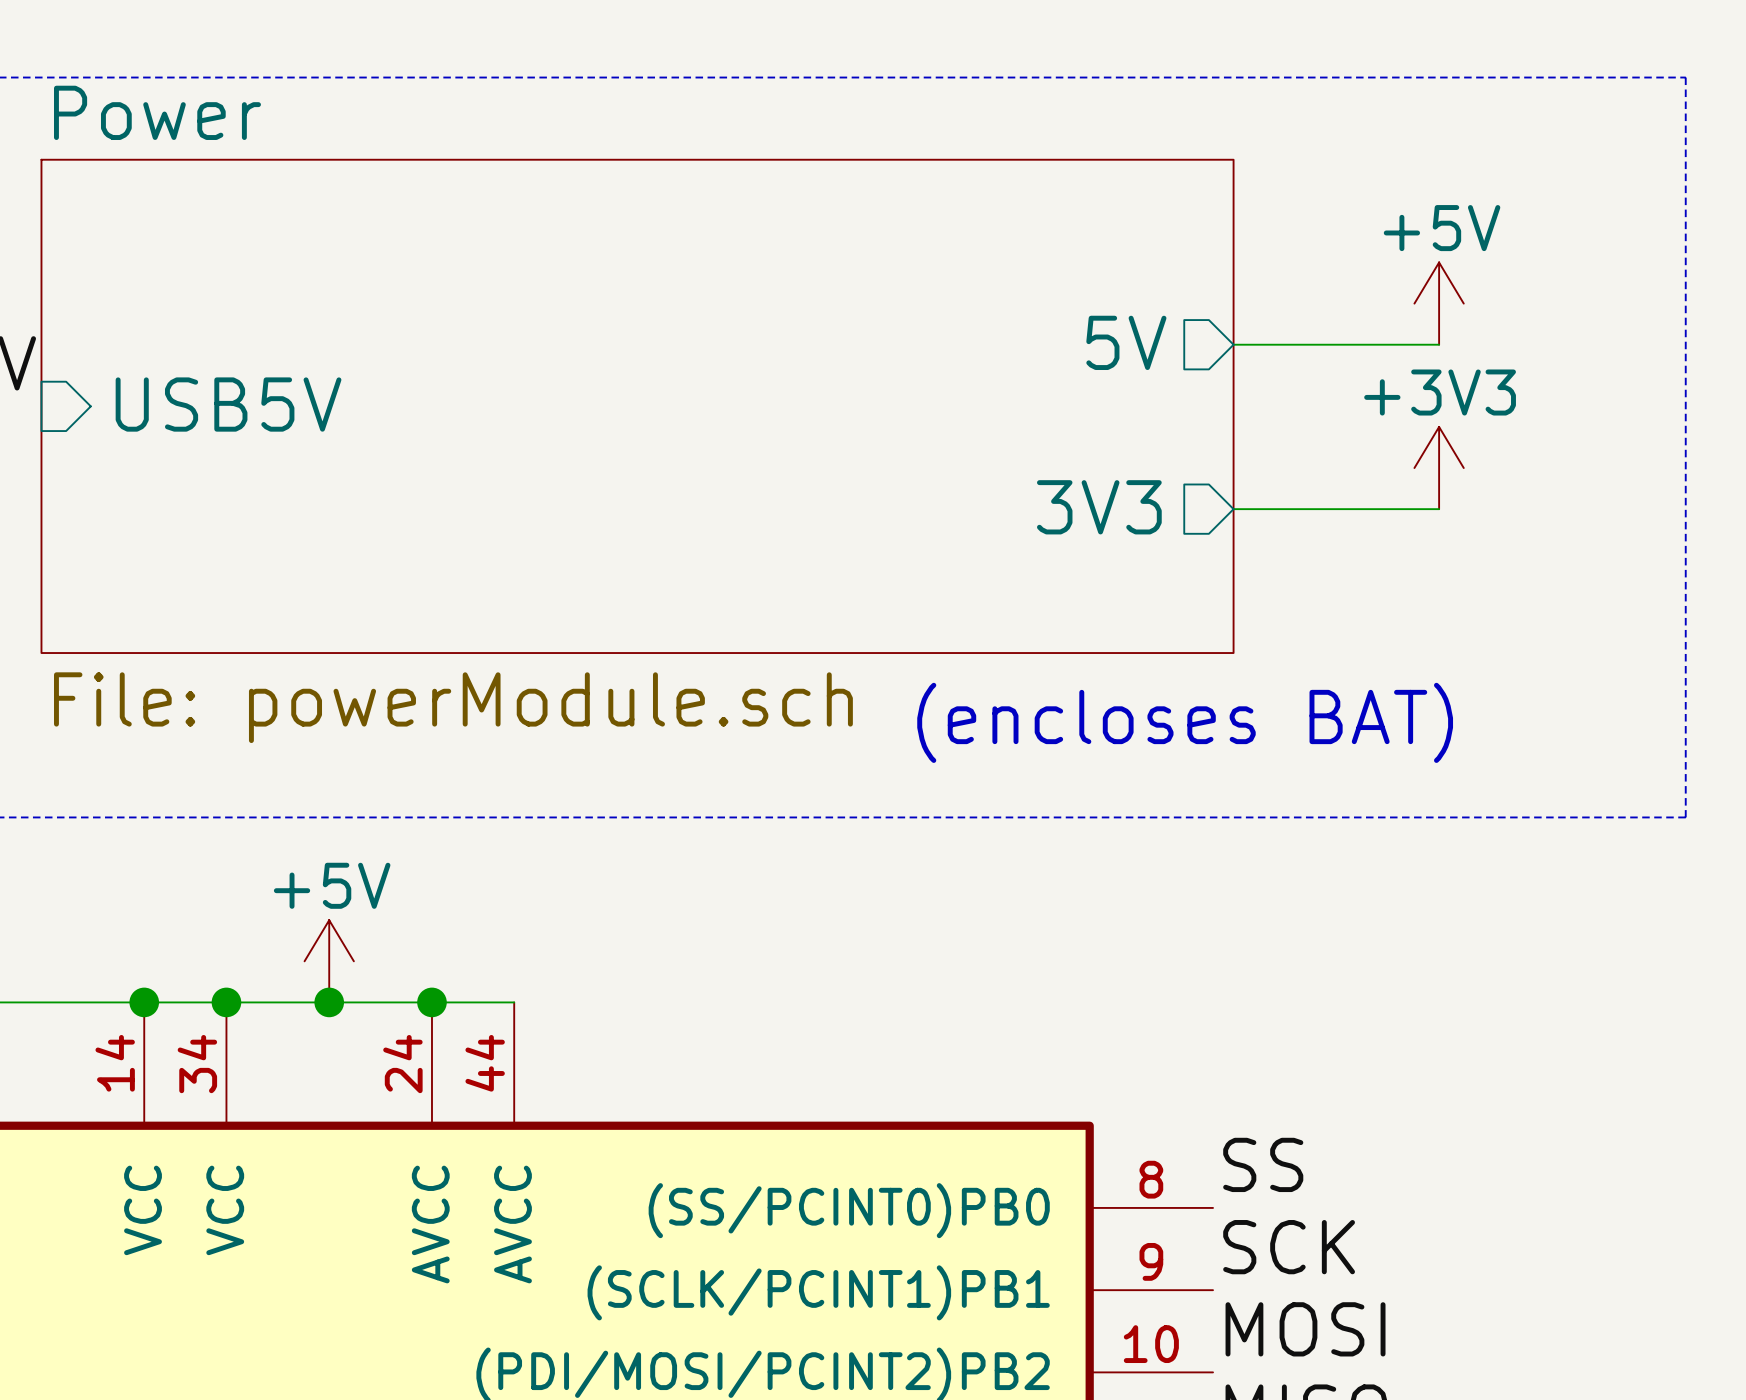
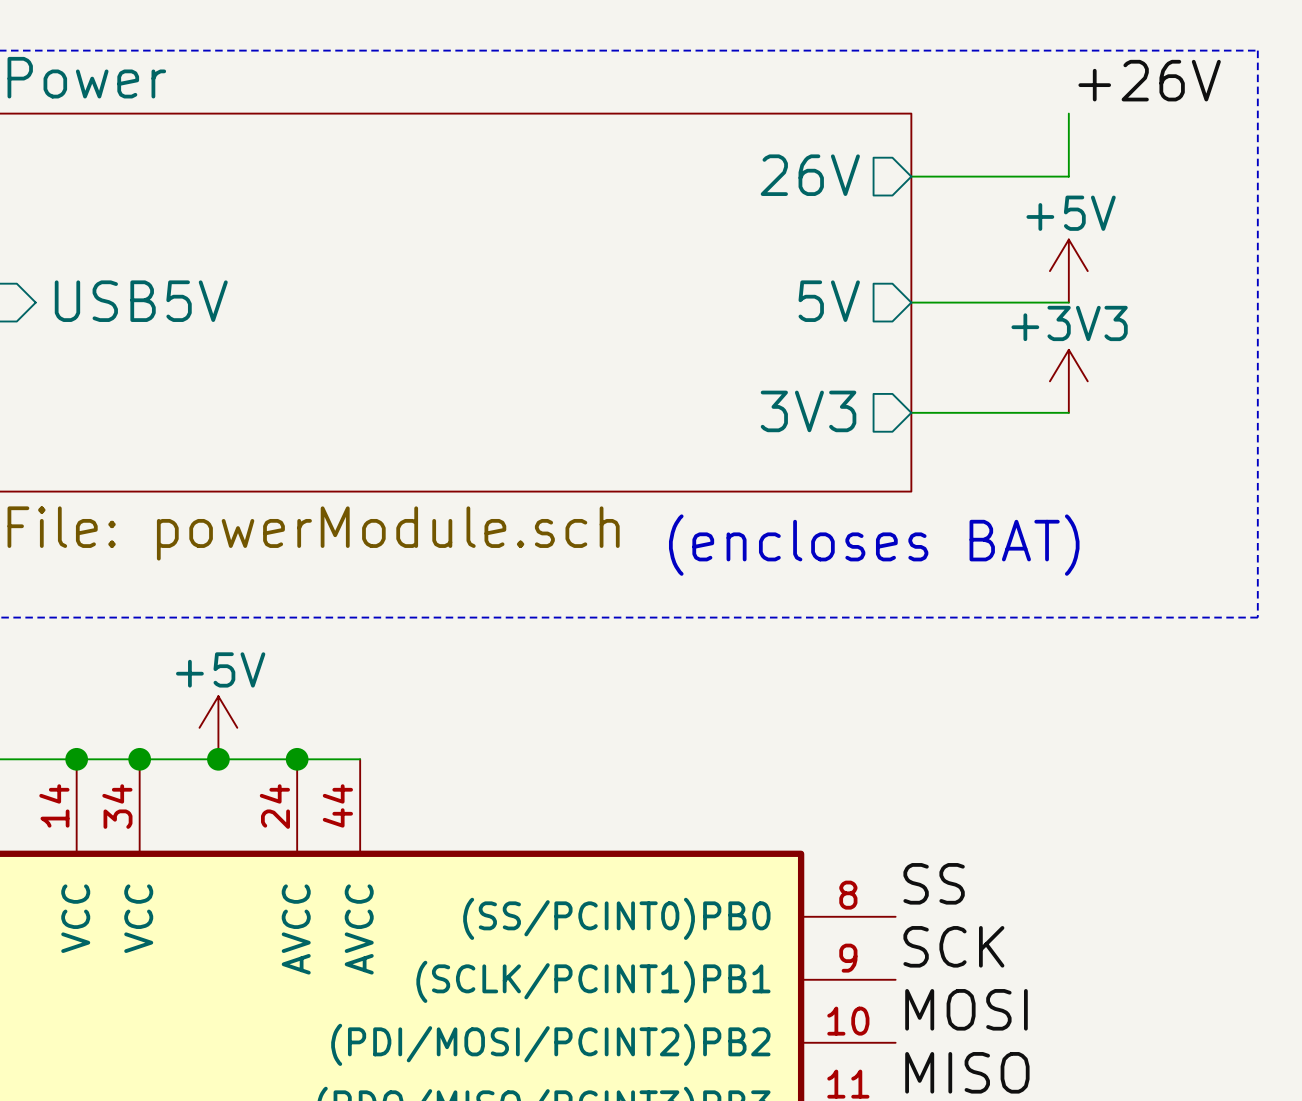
label: none -> +26V (1149, 80)
wire: none -> (1068, 113) (1068, 176) (911, 176)
sheet pin: none -> 26V (810, 175)
power symbol position: +5V (1439, 303) -> +5V (1068, 271)
sheet pin position: 5V (1126, 342) -> 5V (829, 301)
wire: (1233, 344) (1439, 344) -> (911, 302) (1068, 302)
power symbol position: +3V3 (1439, 468) -> +3V3 (1068, 381)
sheet pin position: 3V3 (1099, 507) -> 3V3 (808, 411)
wire: (1233, 509) (1439, 509) -> (911, 412) (1068, 412)

